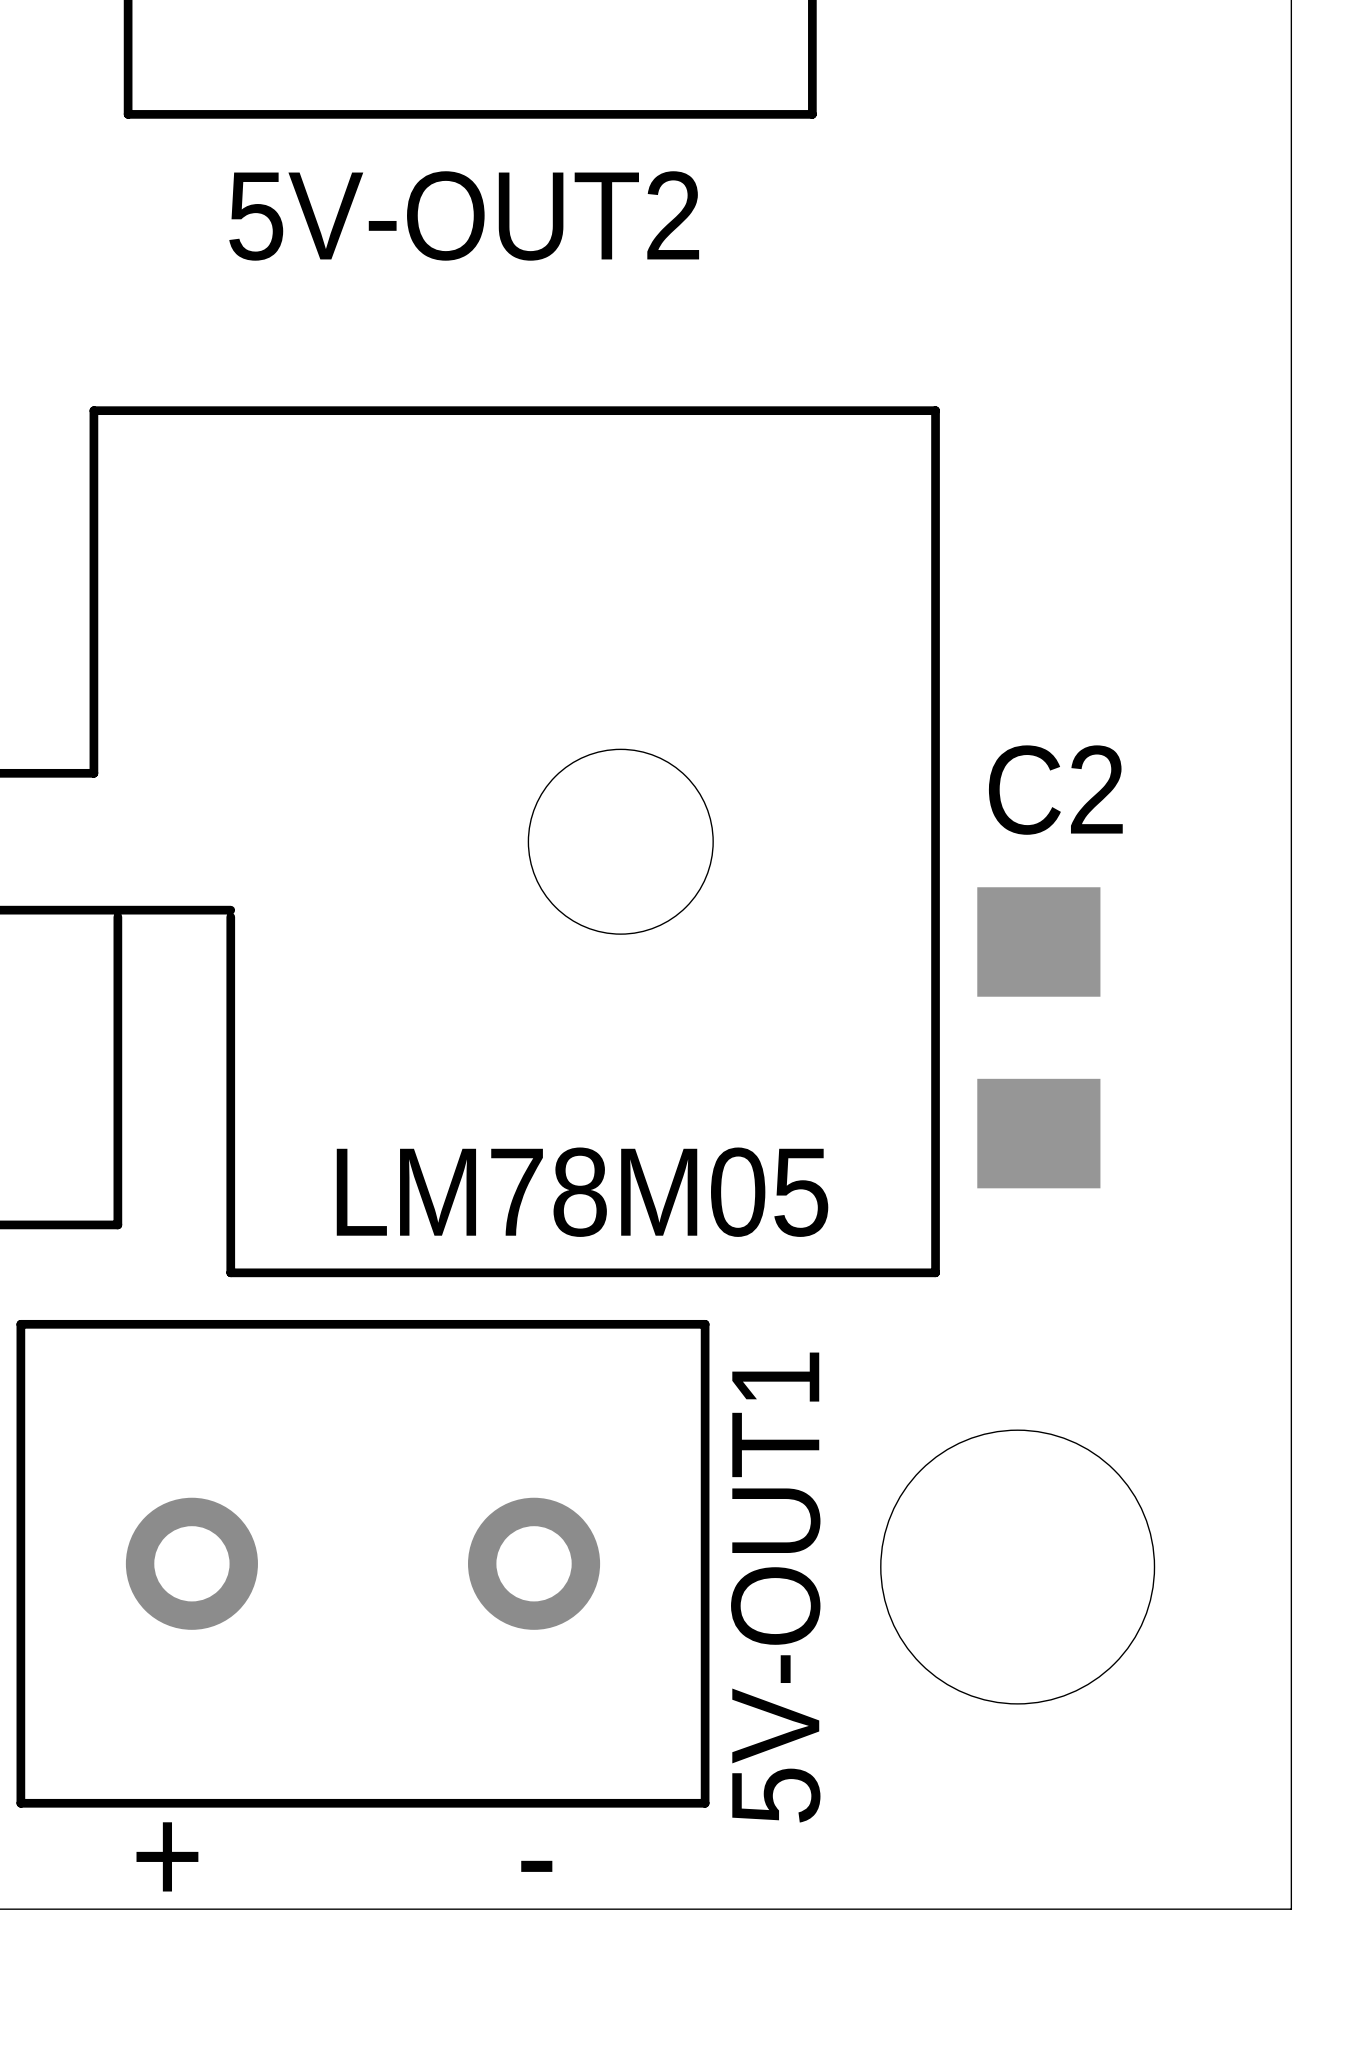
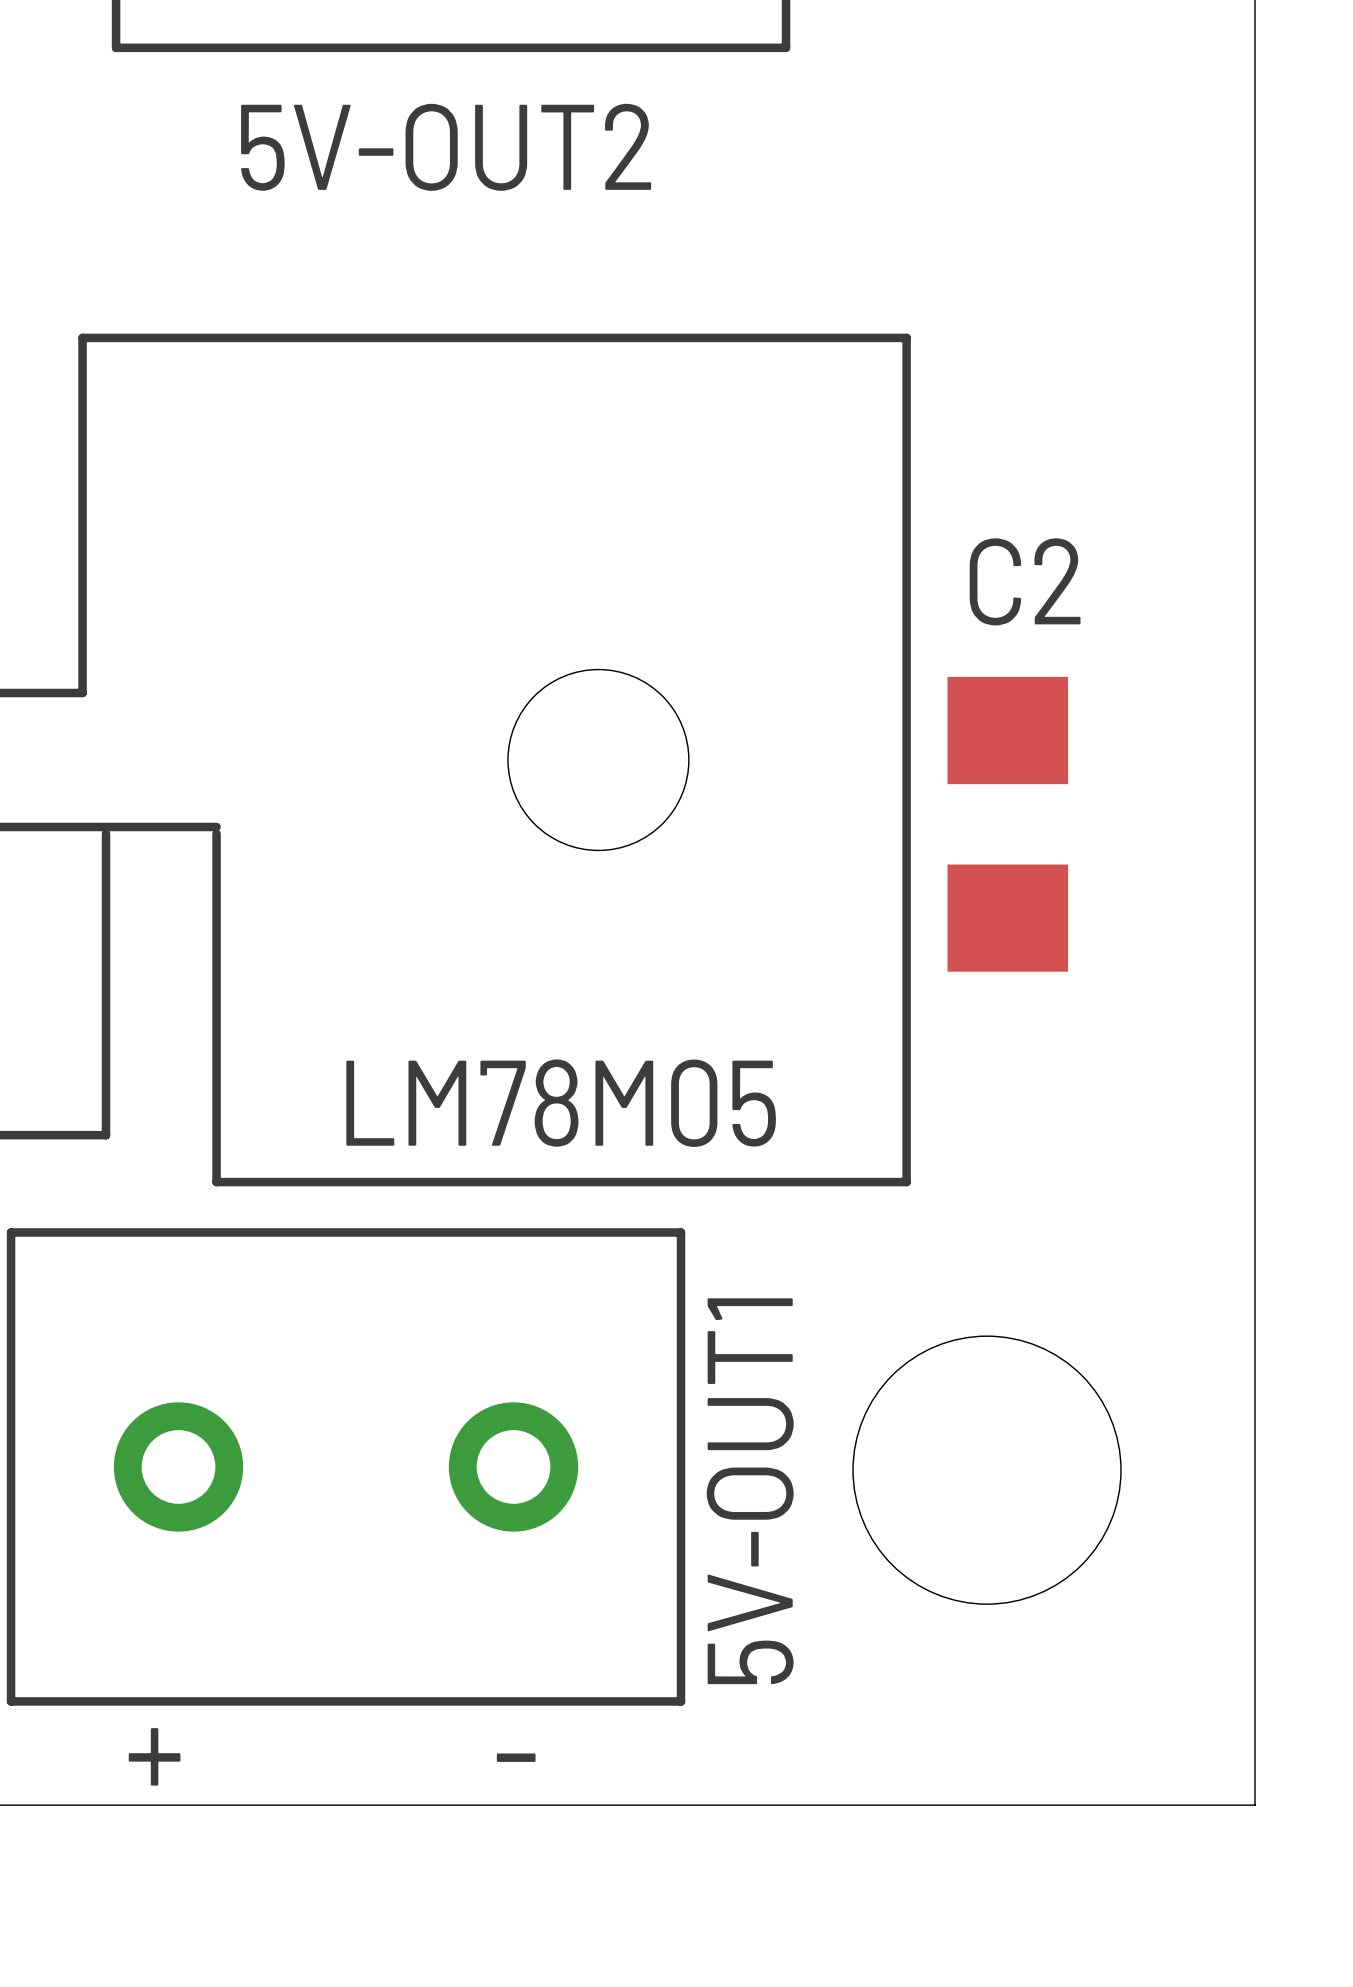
C2 position: (1038, 1037) -> (1007, 824)

